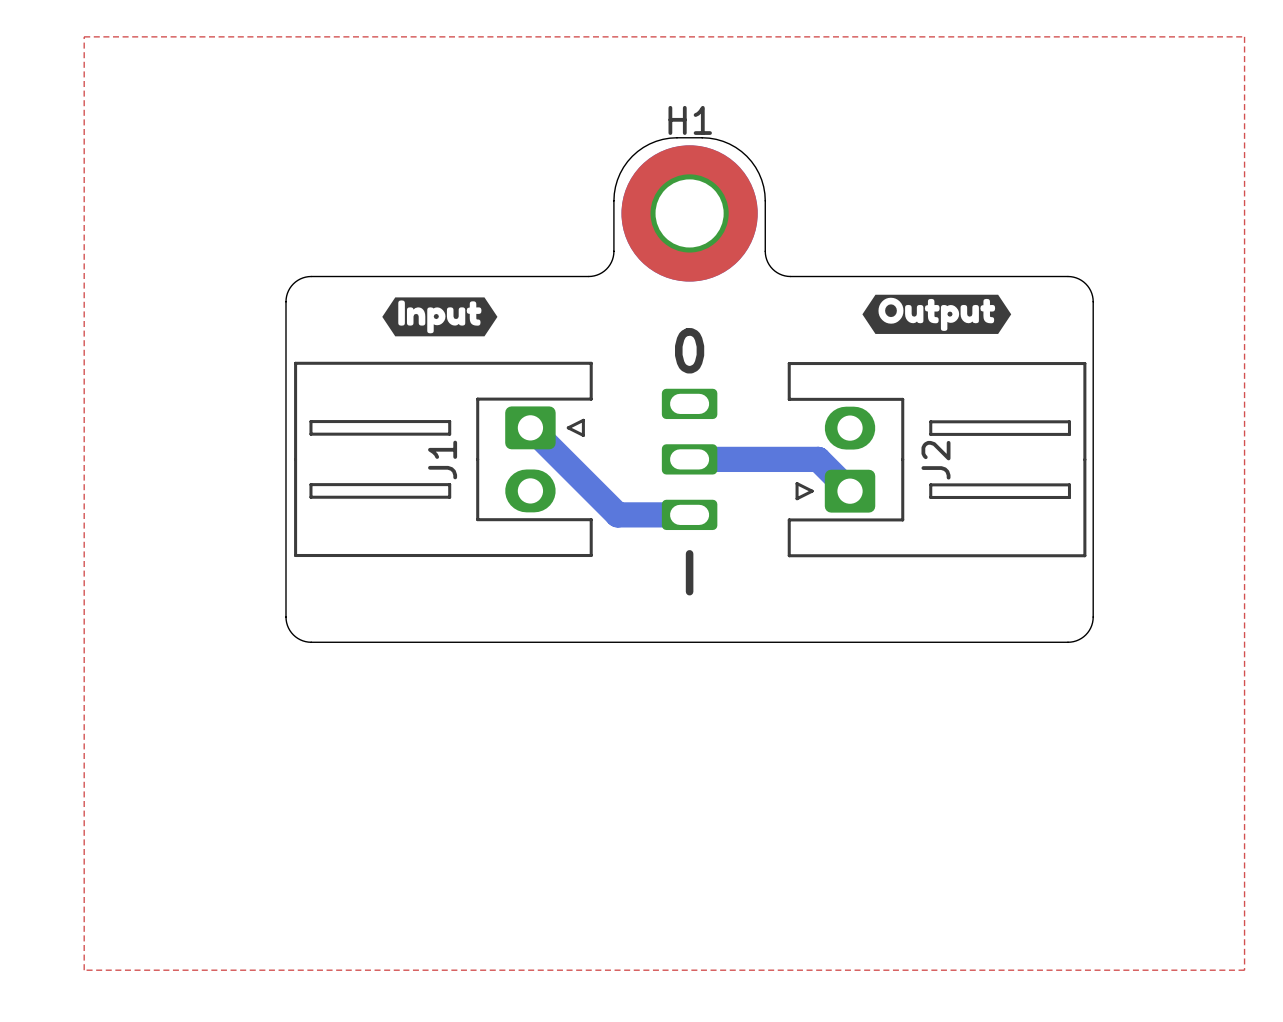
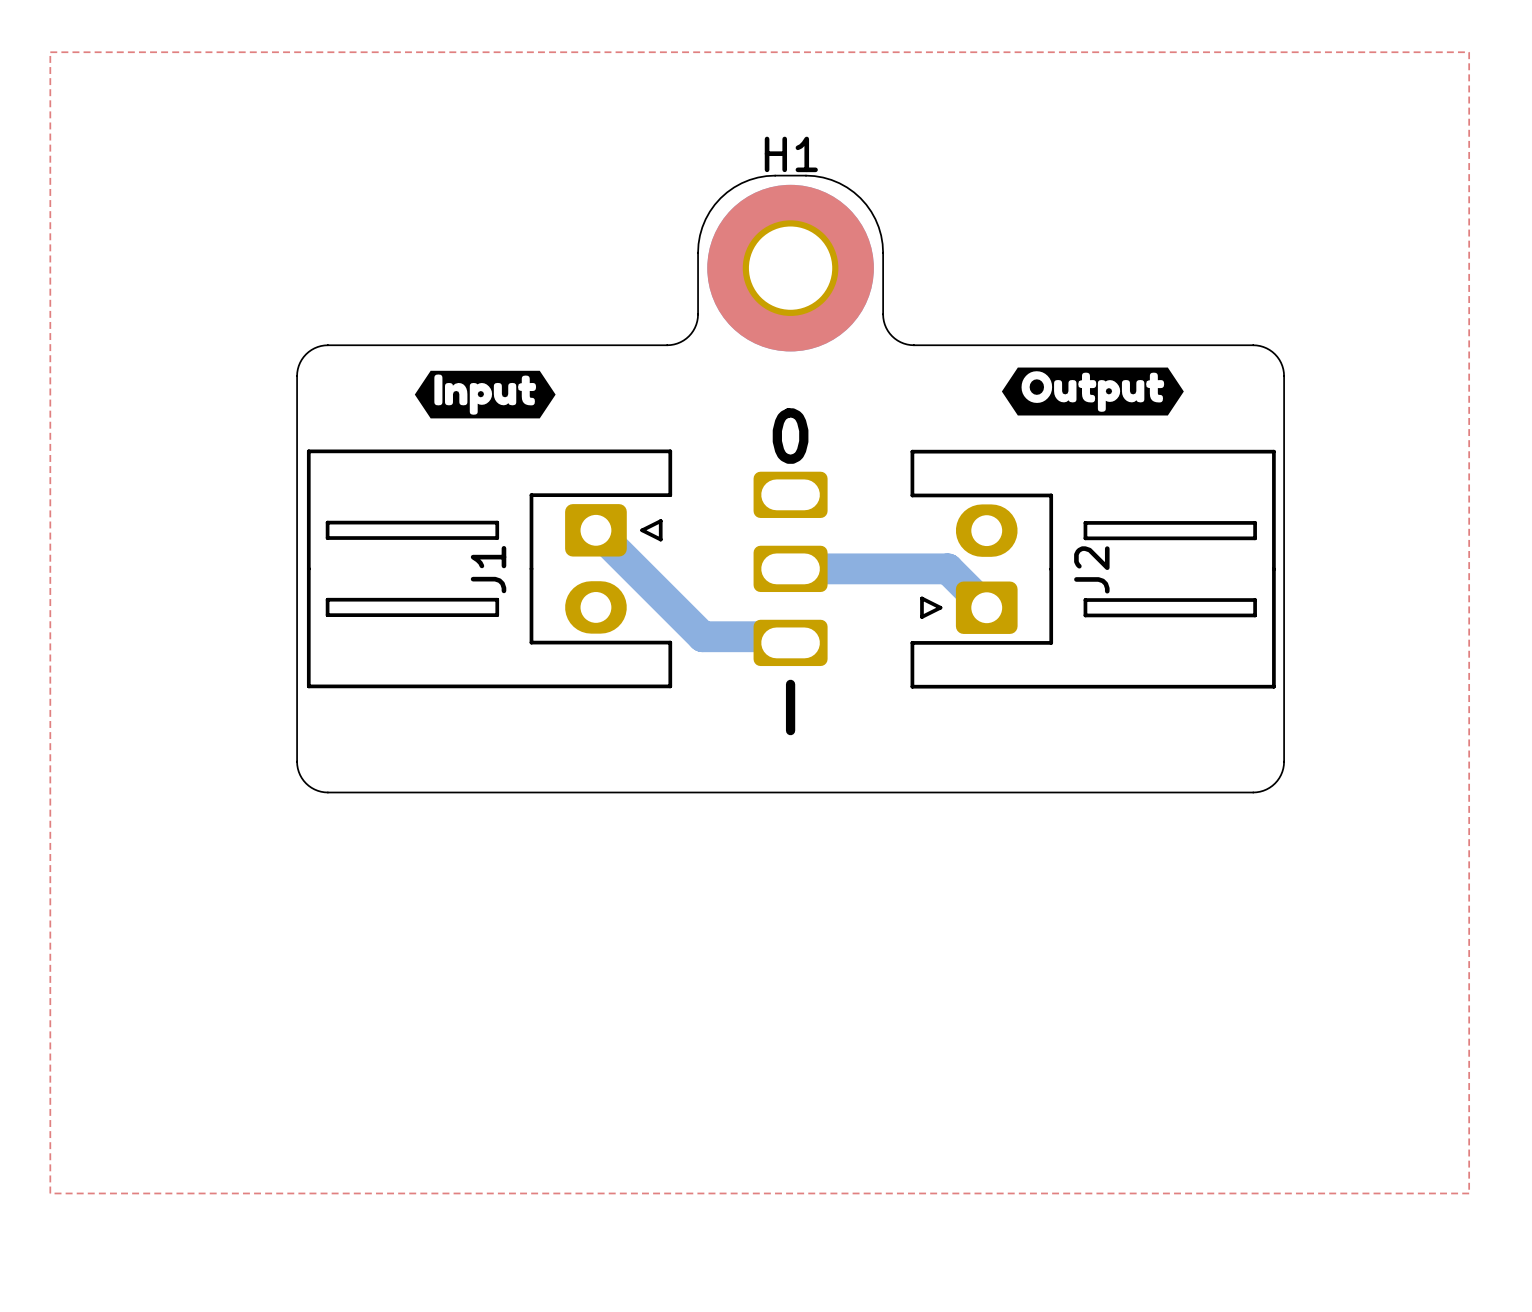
part footprint: [661, 388, 718, 531] -> [753, 471, 828, 667]

